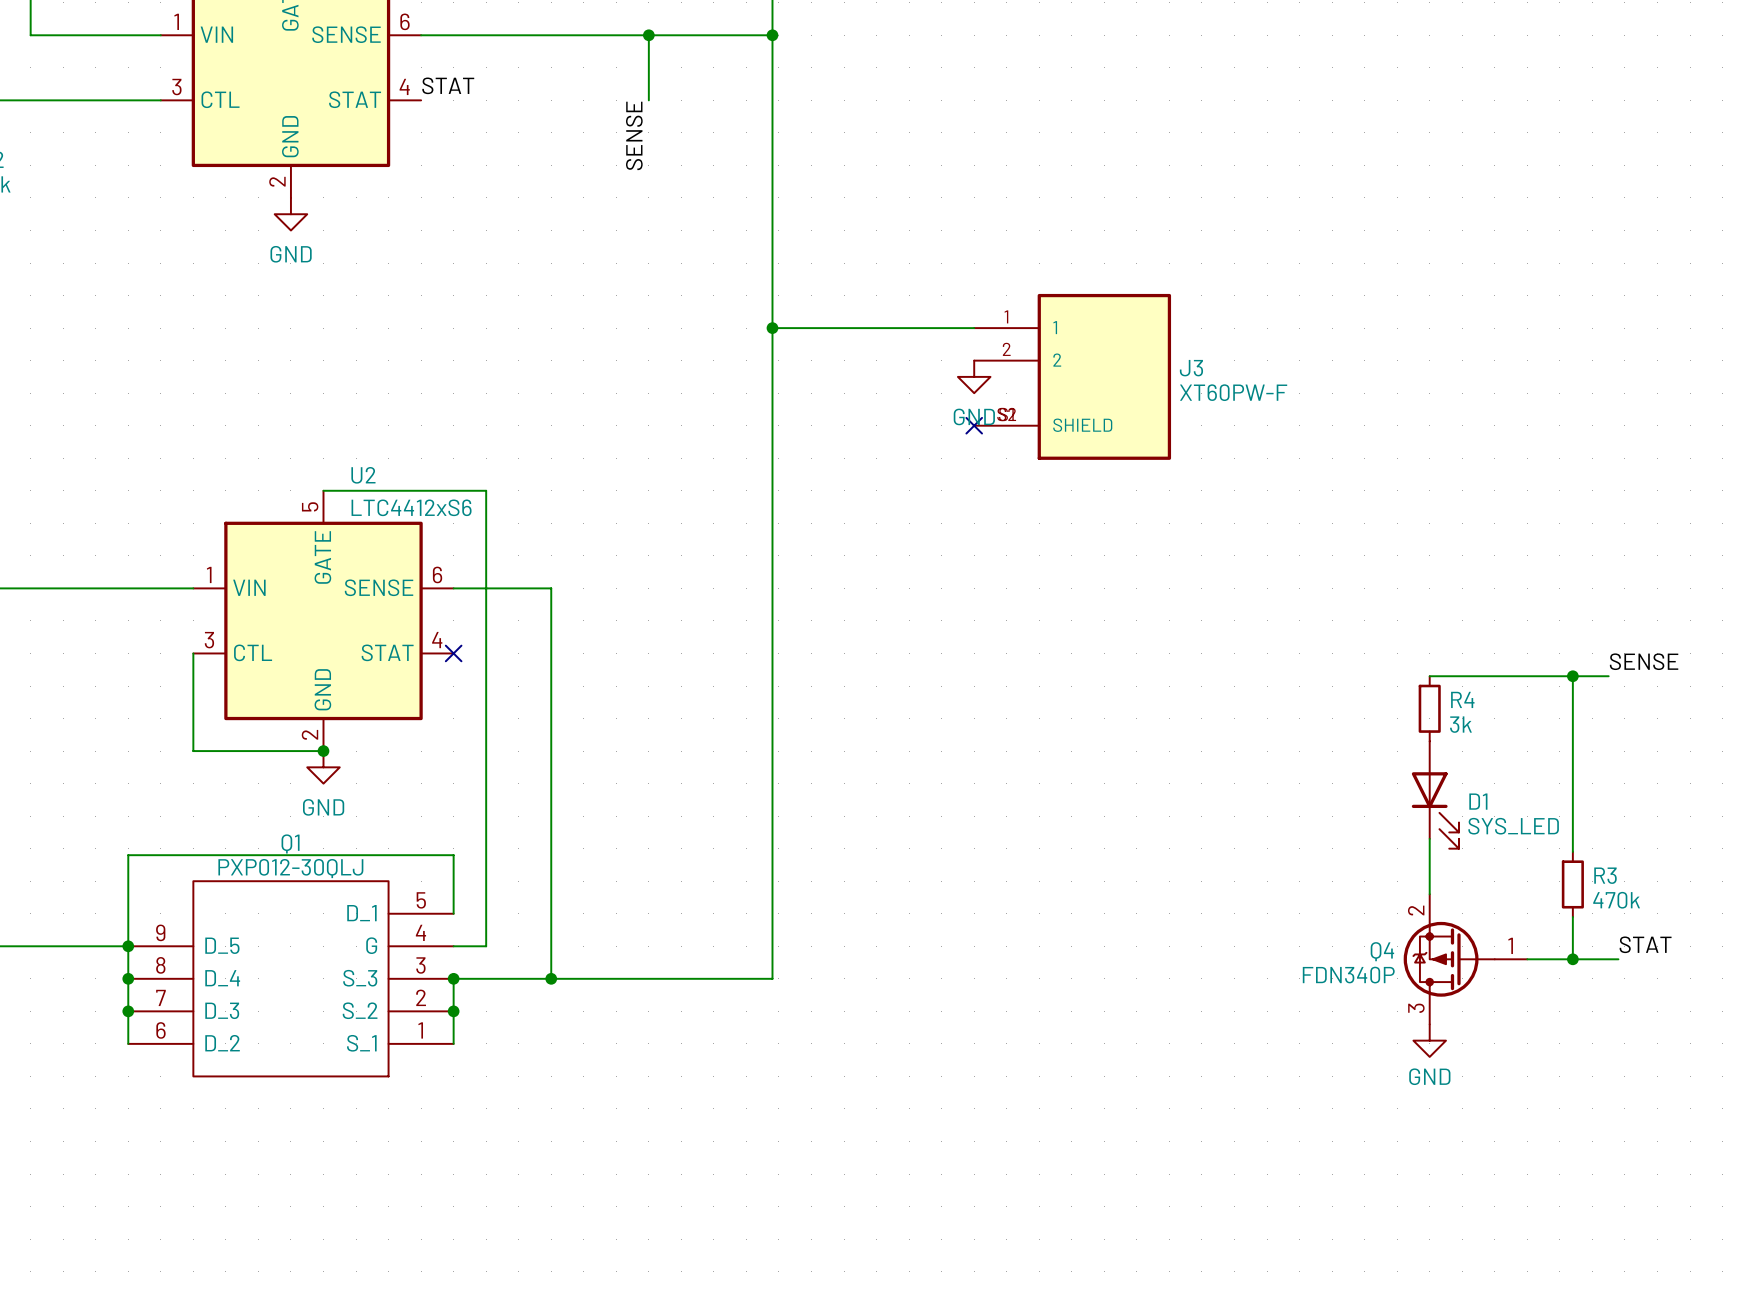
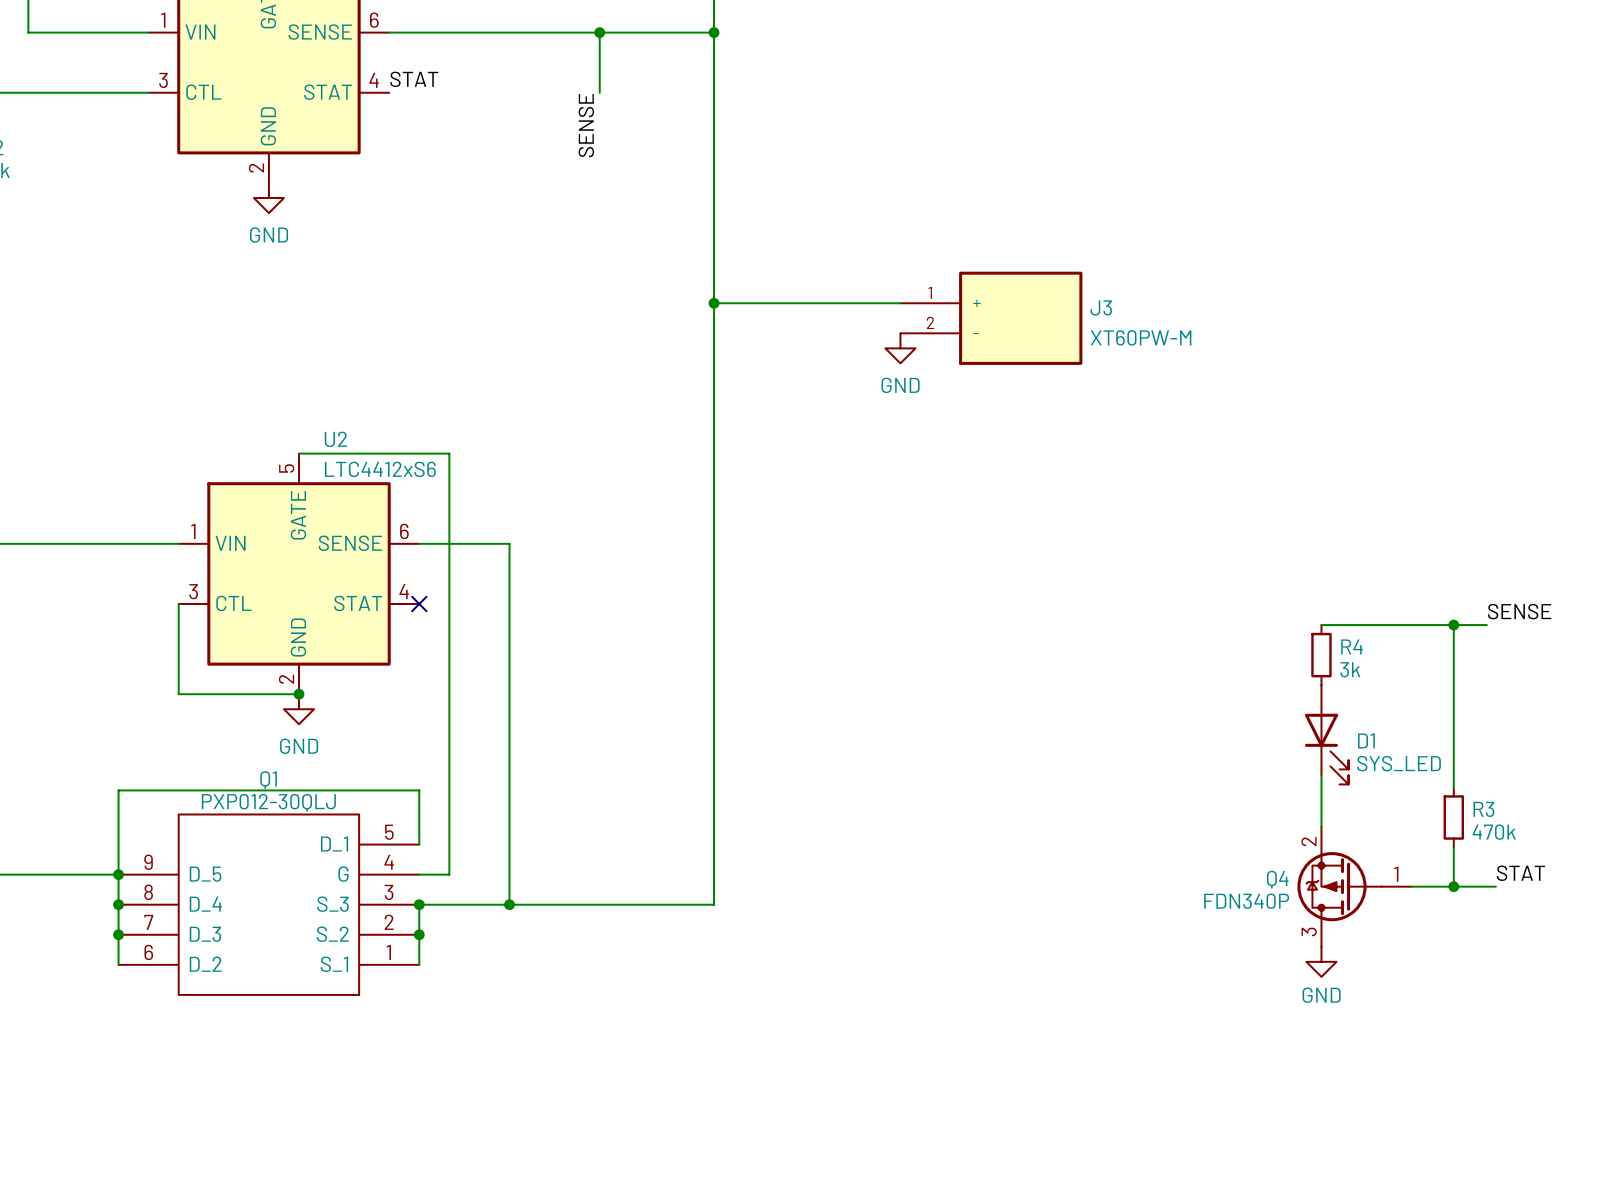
J3 symbol: [974, 293, 1172, 460] -> [900, 271, 1083, 365]
J3 value: XT60PW-F (1233, 392) -> XT60PW-M (1141, 337)
no-connect mark: (974, 425) -> none

